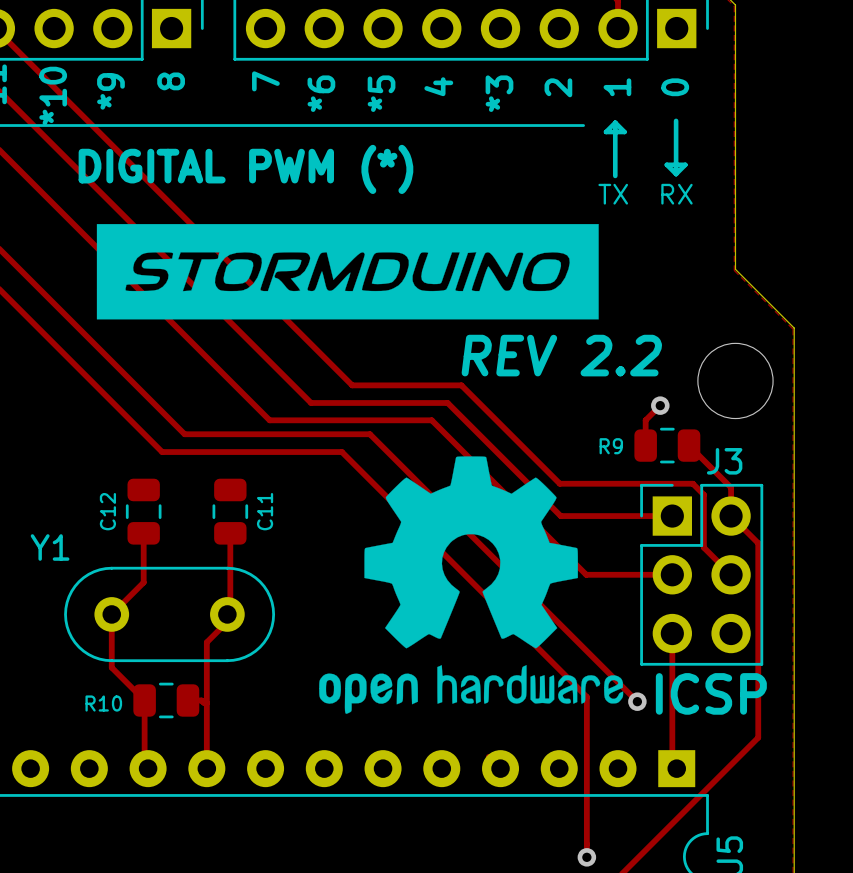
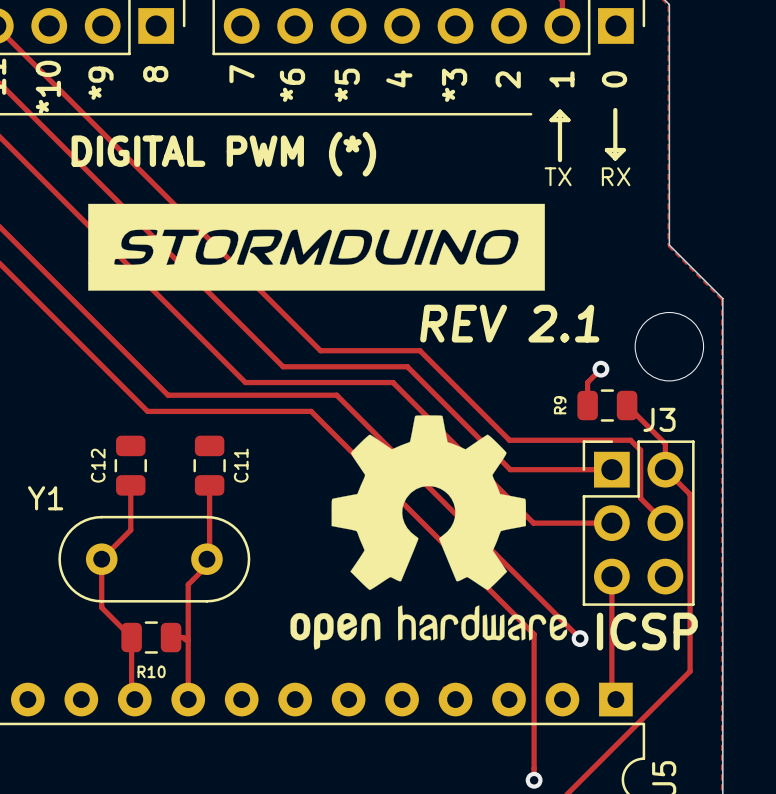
text: REV 2.2 (561, 355) -> REV 2.1 (509, 323)
R9 name rotation: 0° (611, 446) -> 90° counterclockwise (560, 405)
R10 name position: R10 (103, 703) -> R10 (151, 671)

